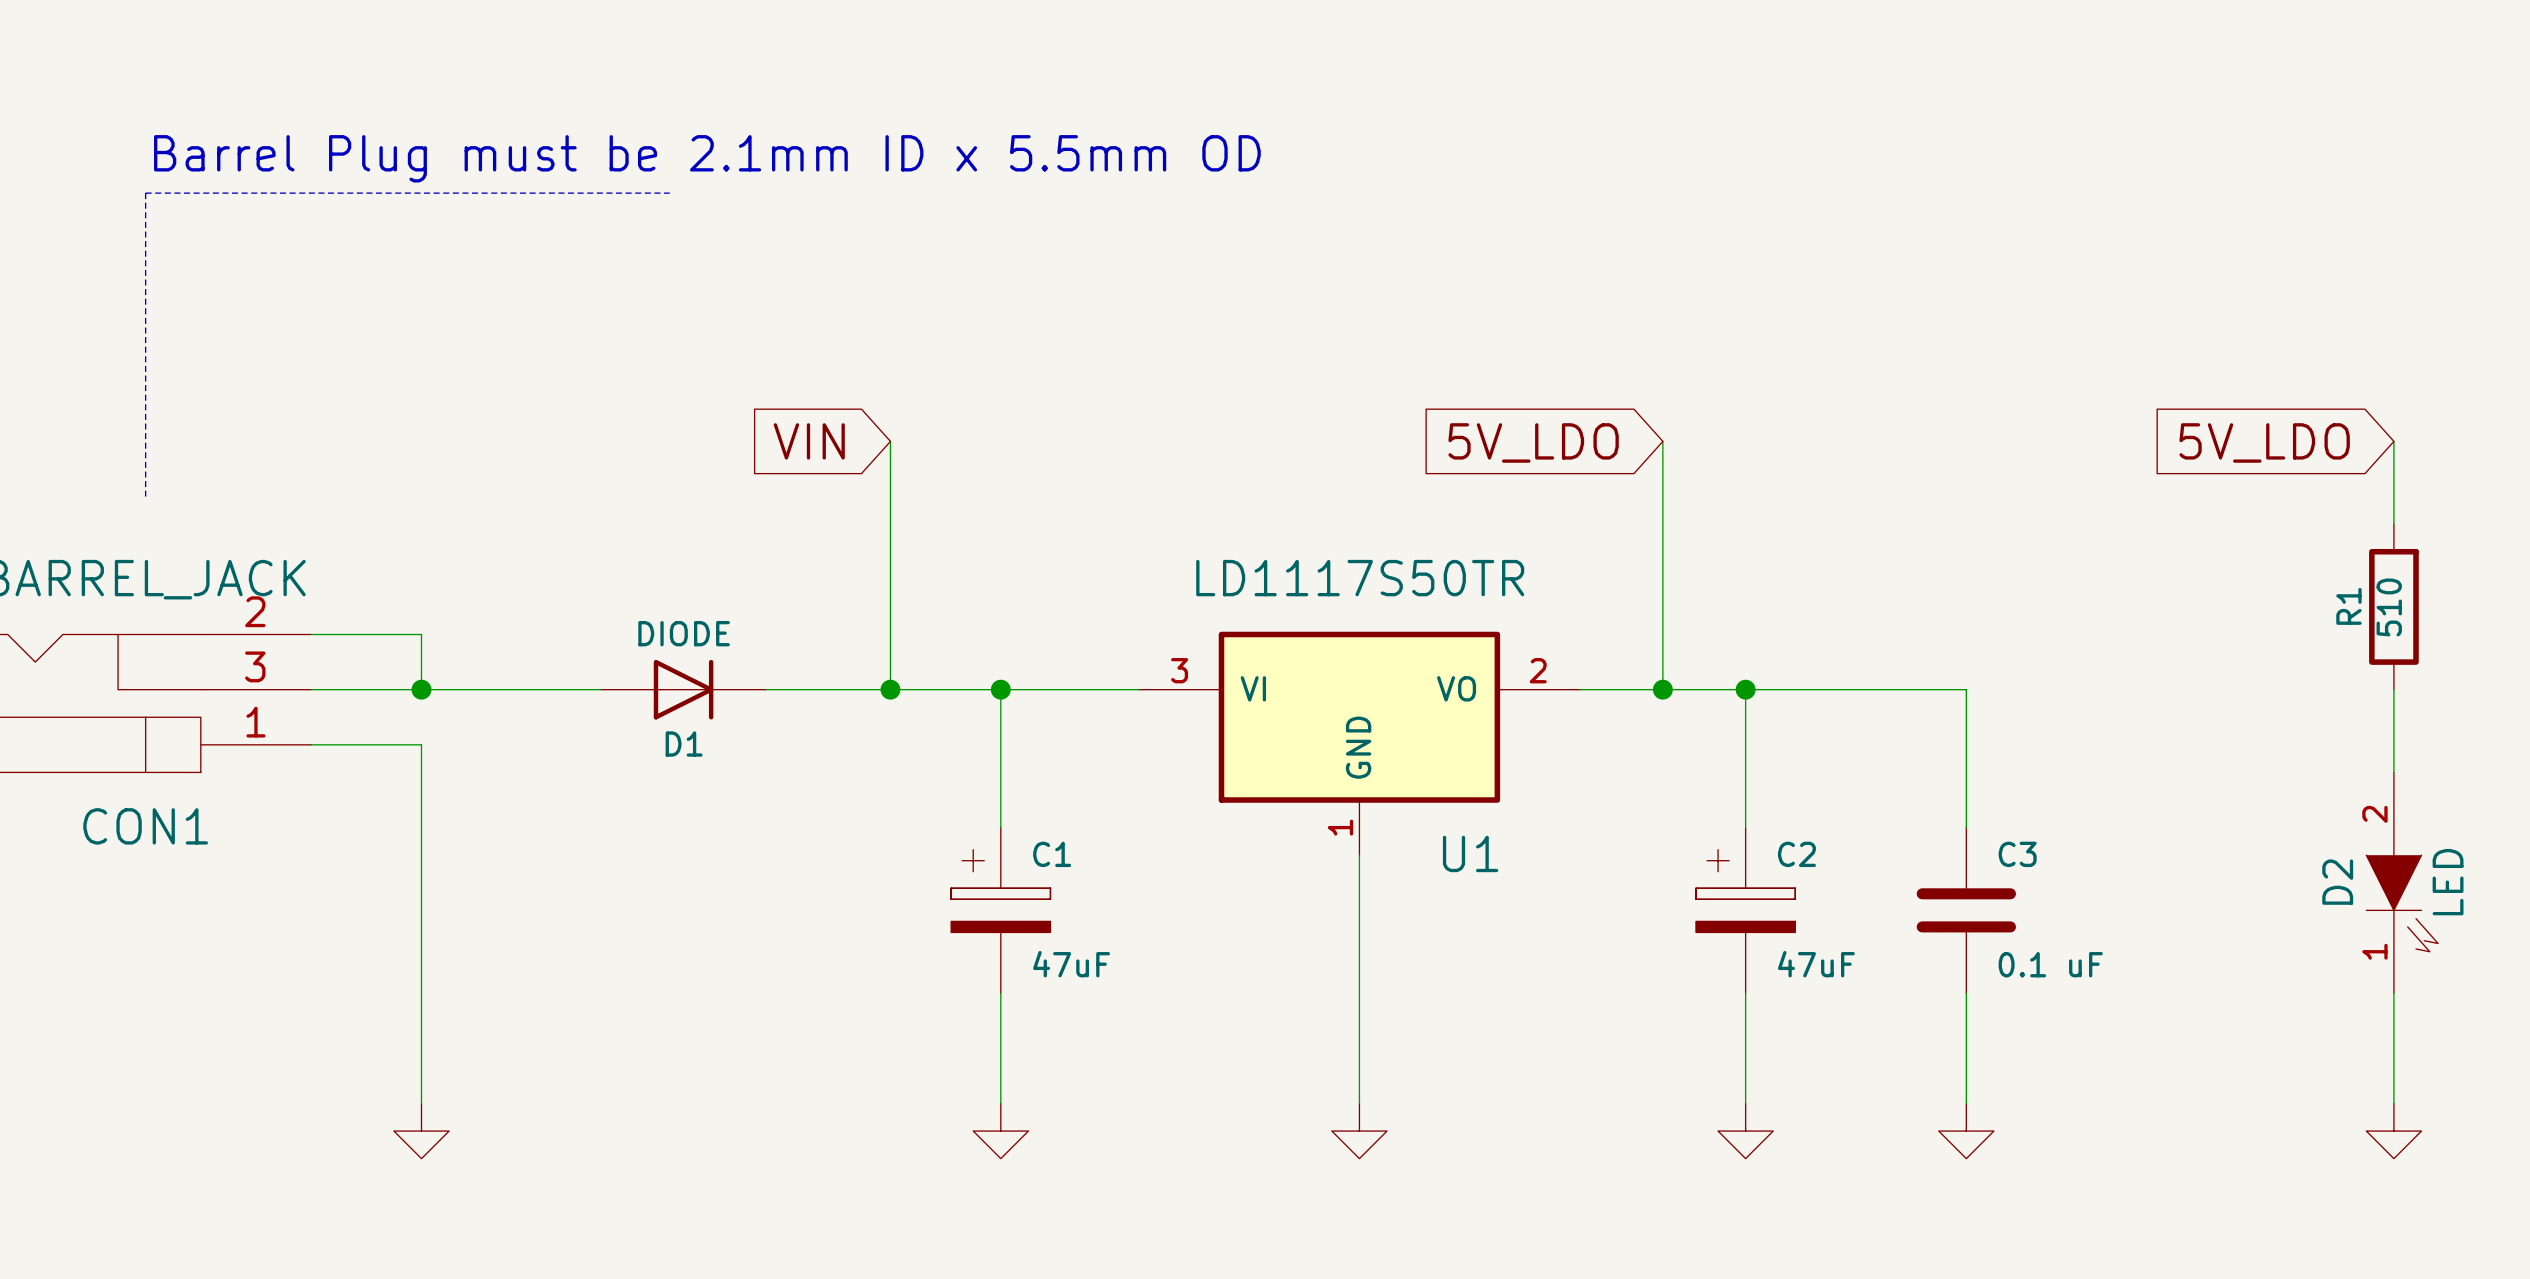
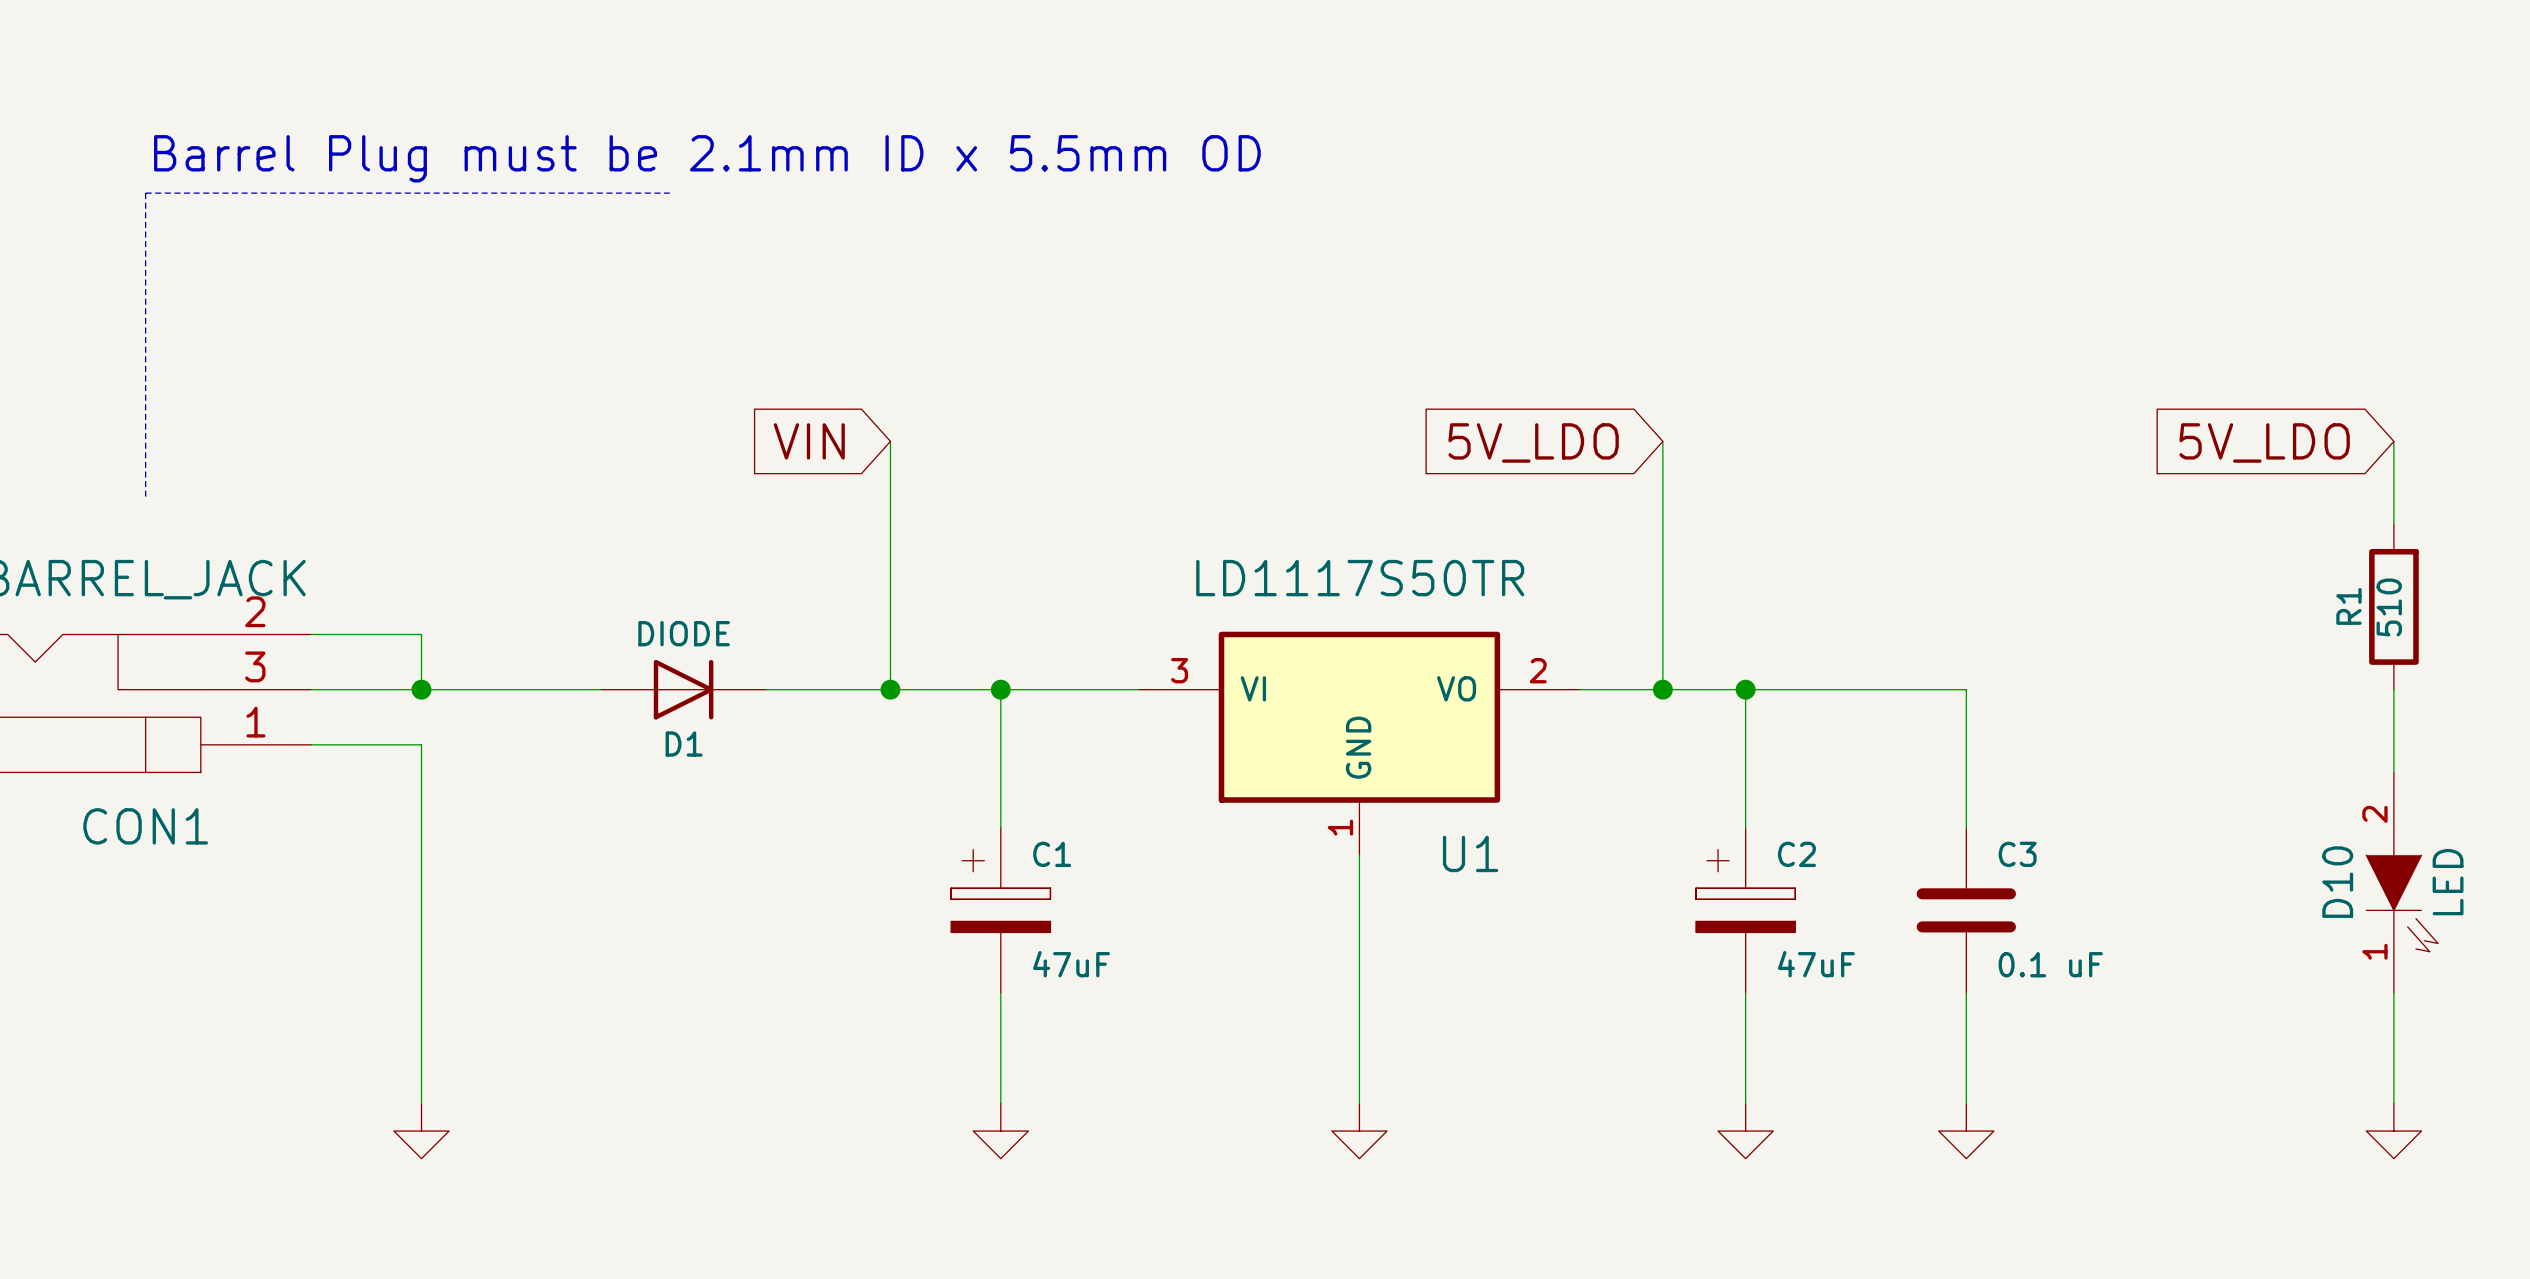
D2 name: D2 (2337, 882) -> D10 (2337, 882)

